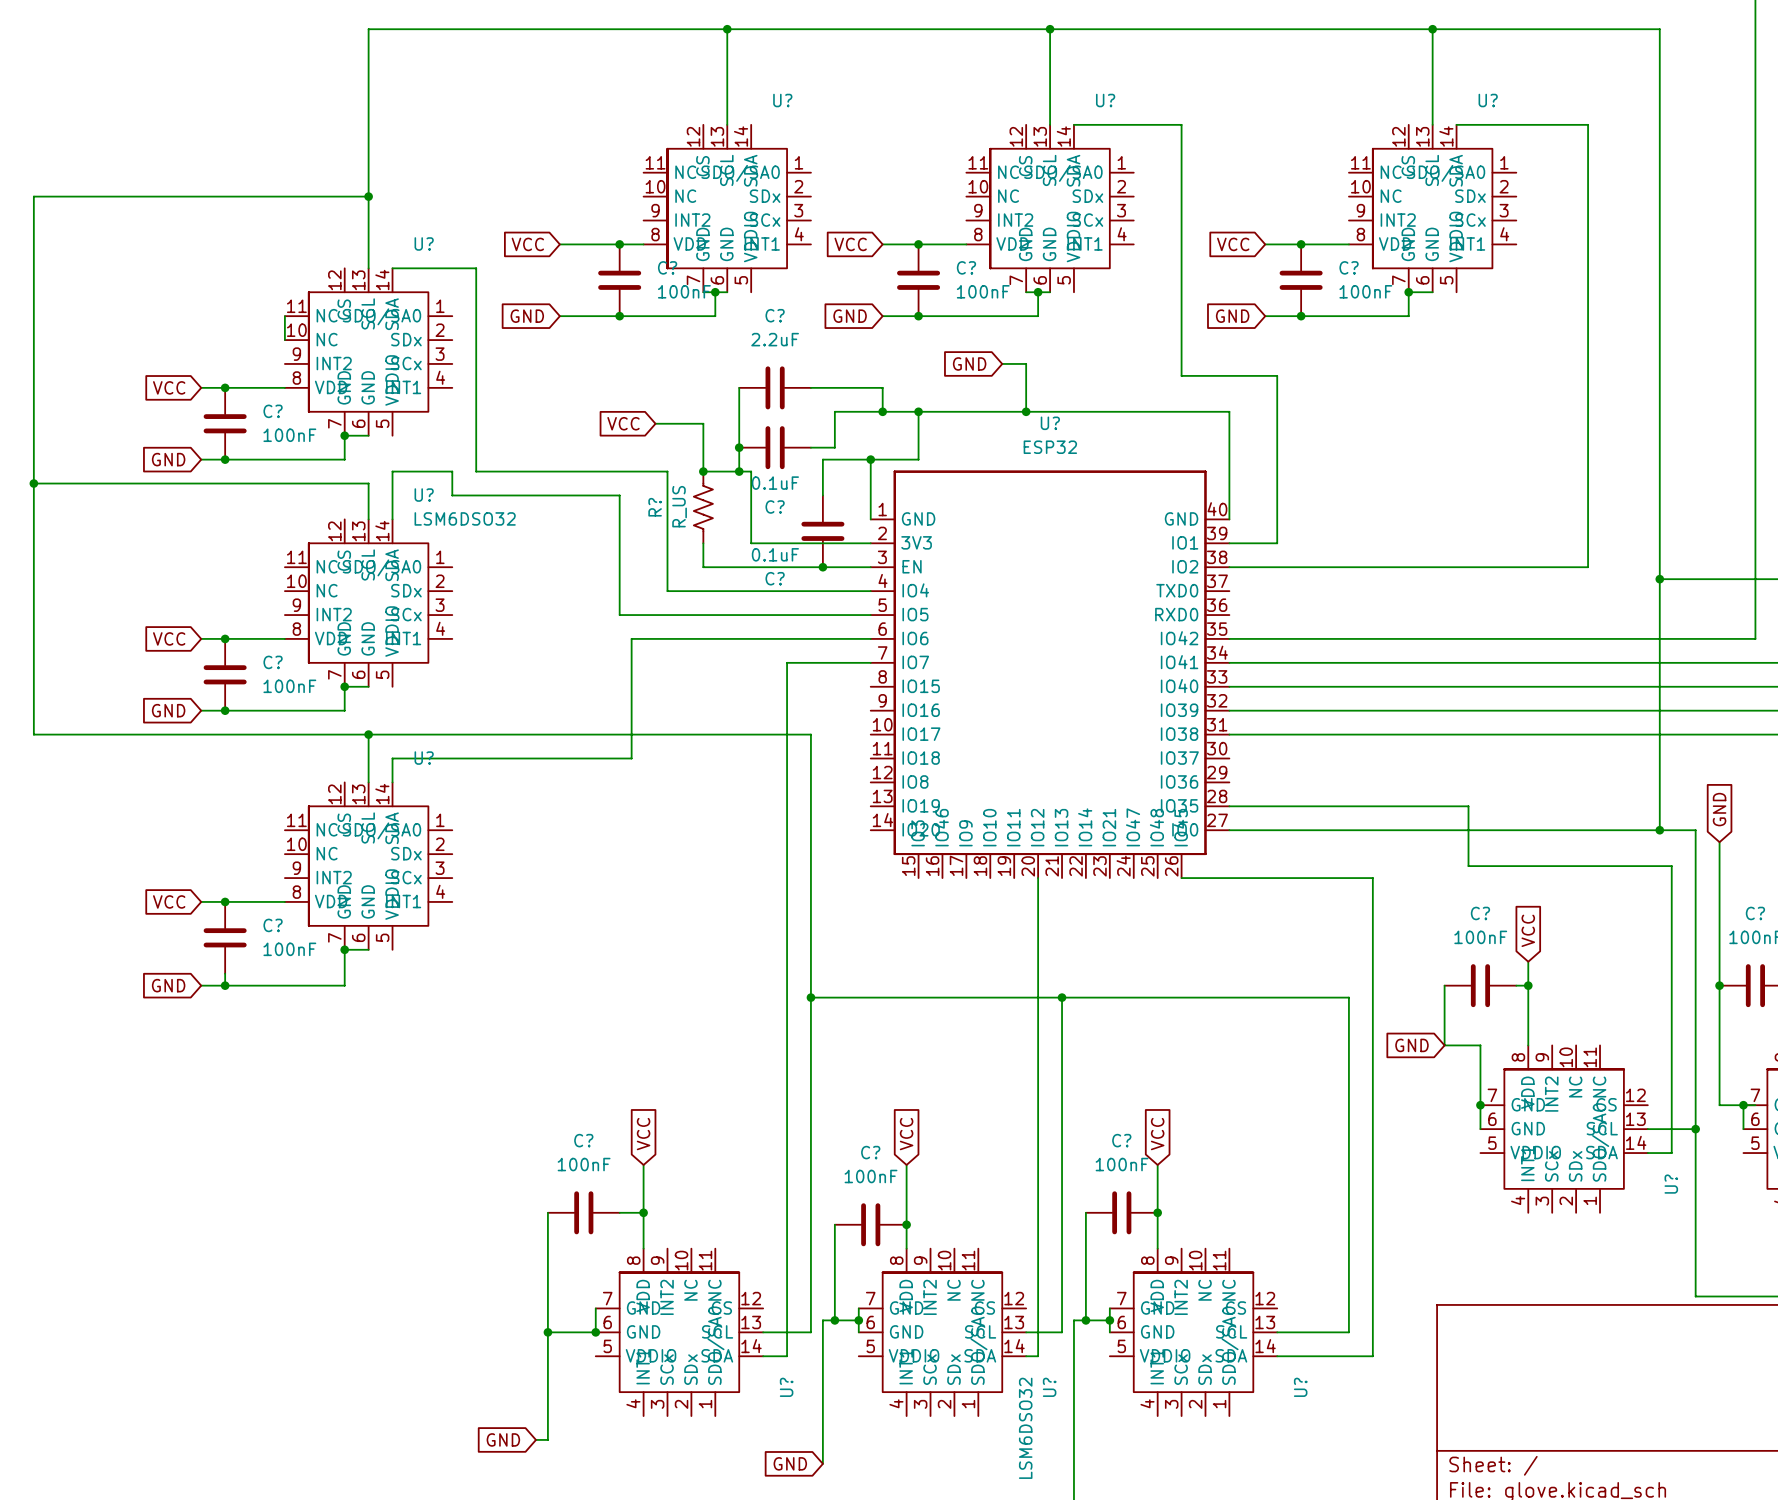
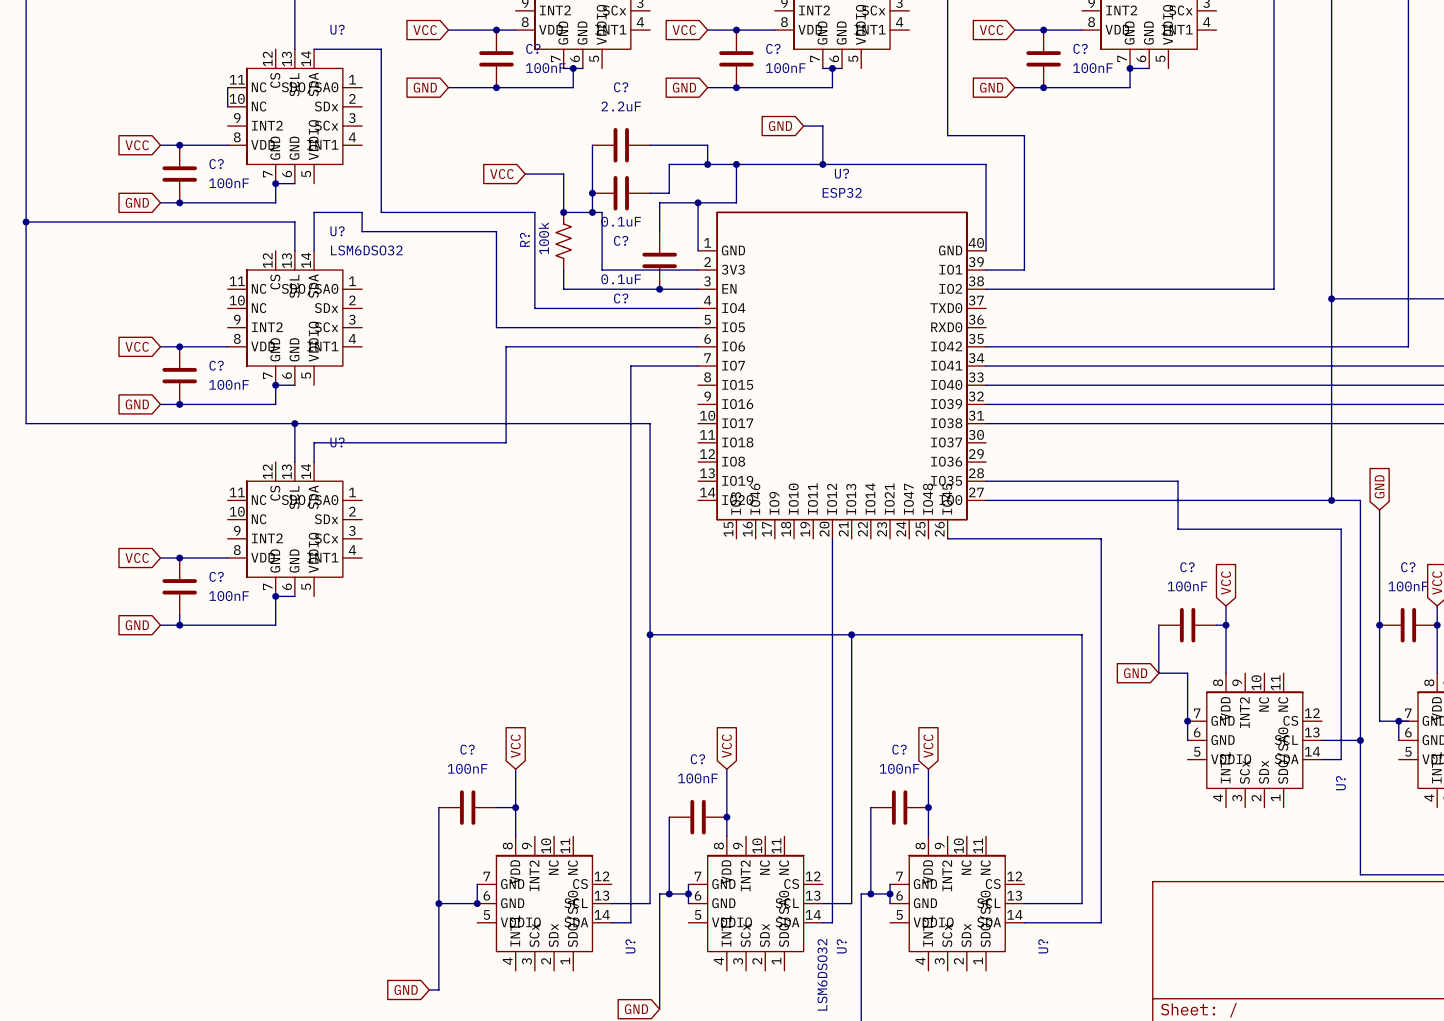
R? value: R_US (679, 506) -> 100k (543, 238)

